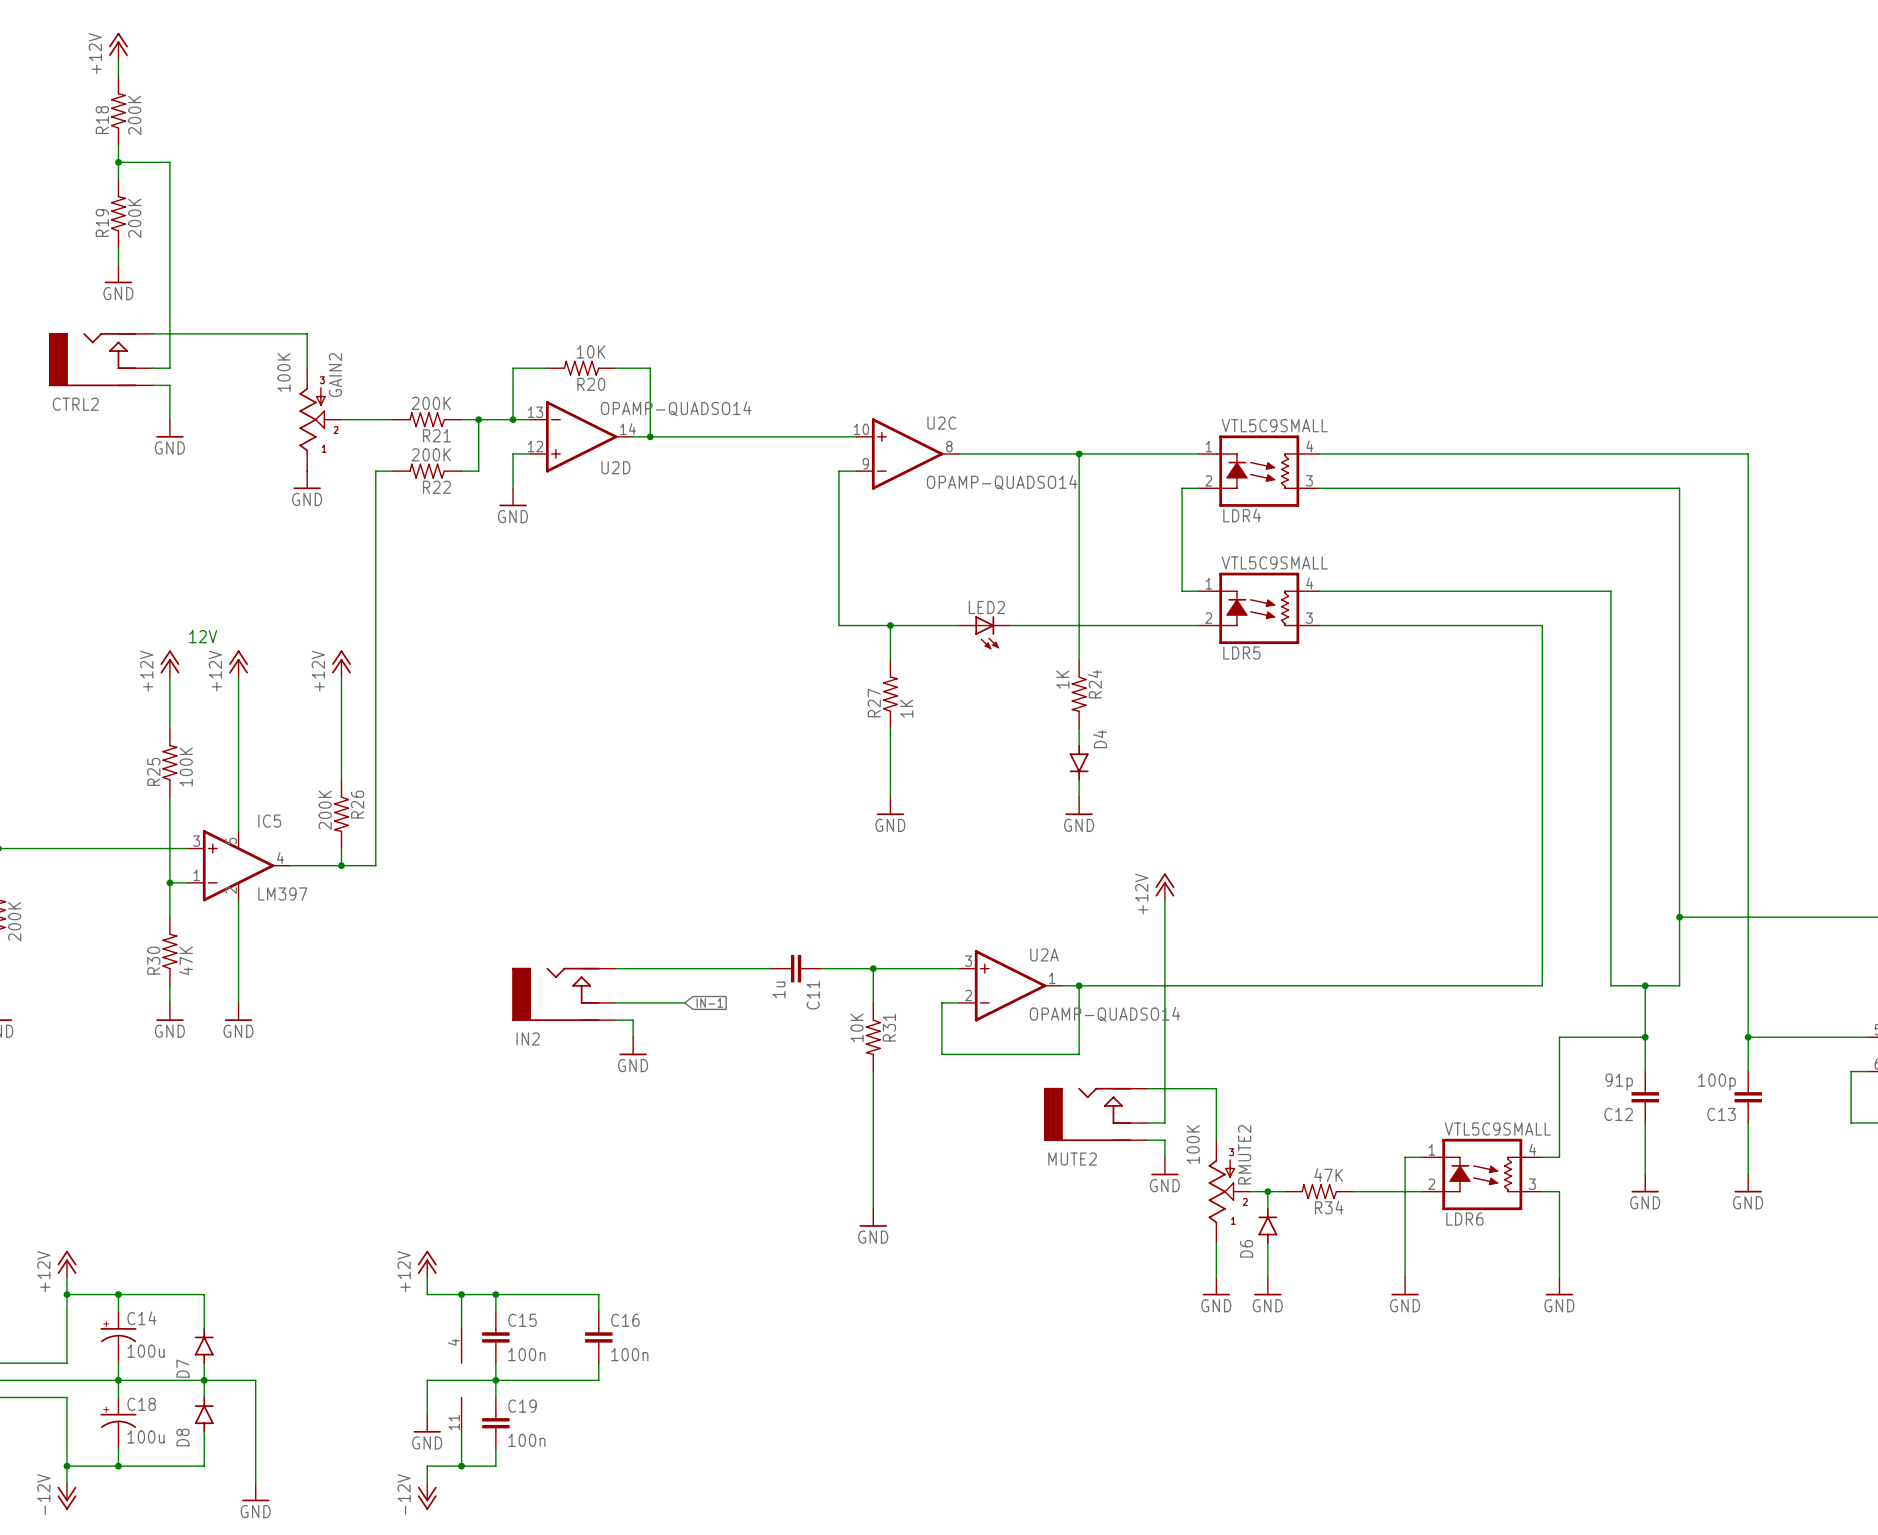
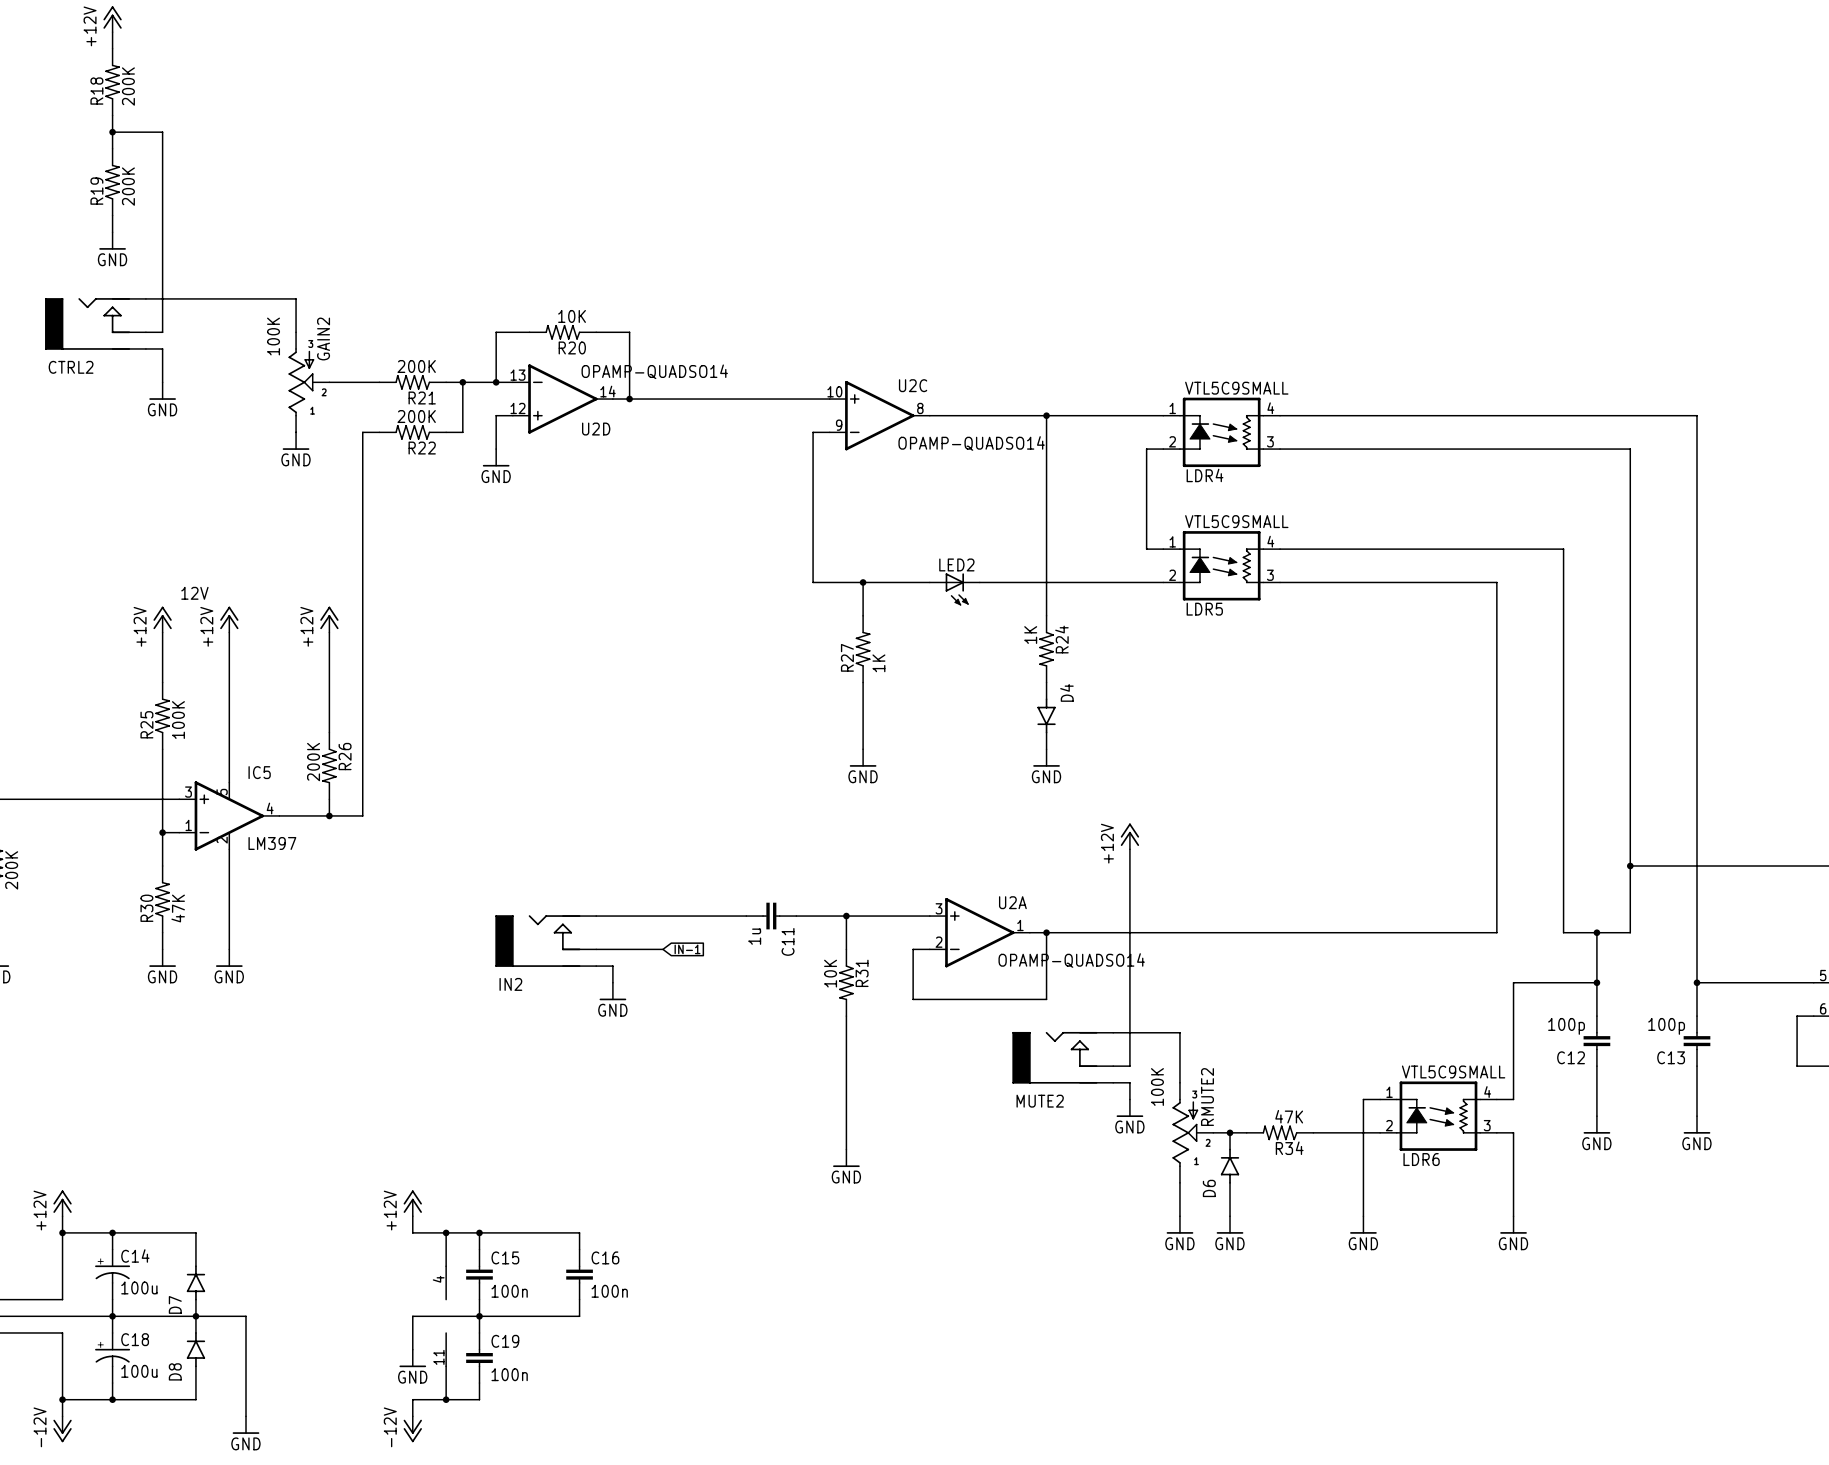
C12 value: 91p (1619, 1082) -> 100p (1566, 1026)

